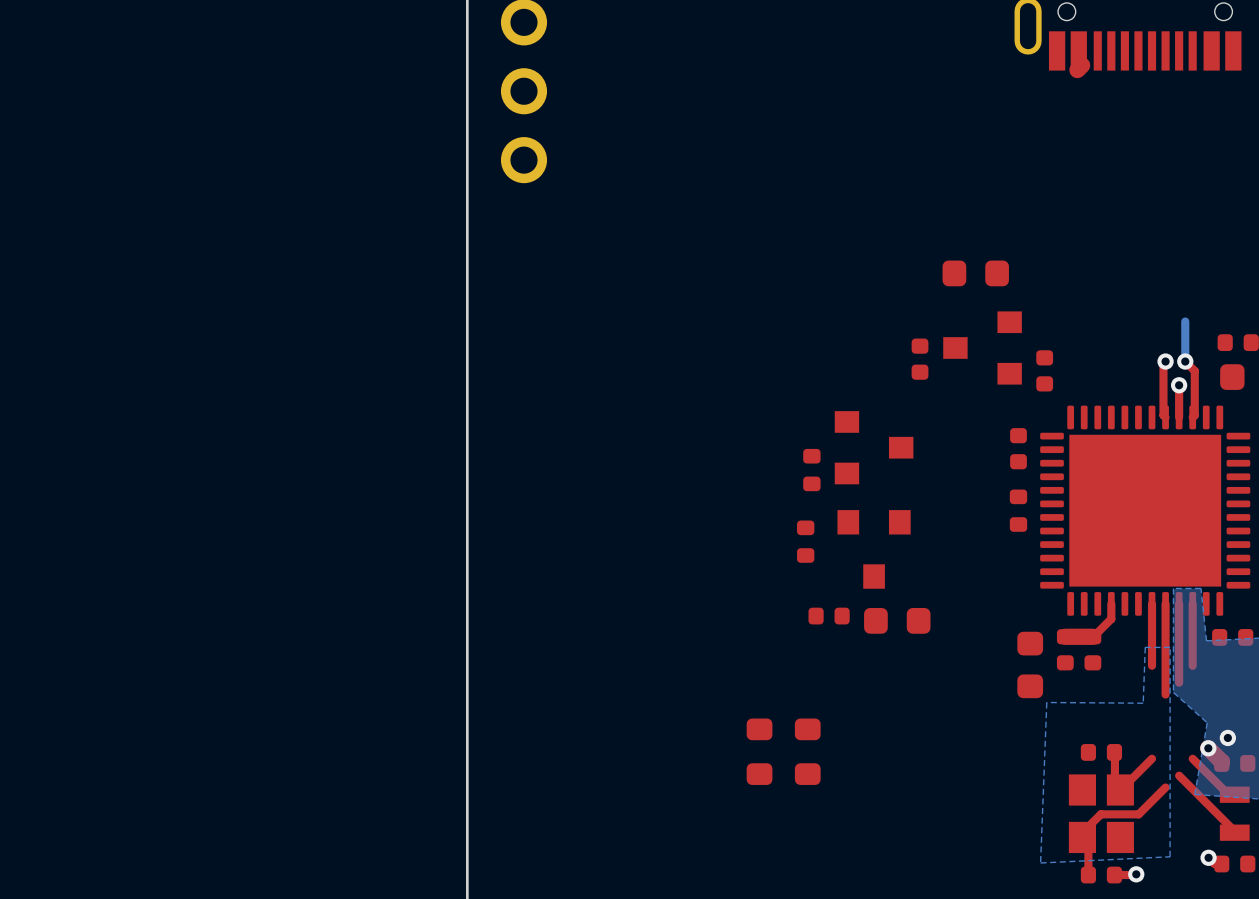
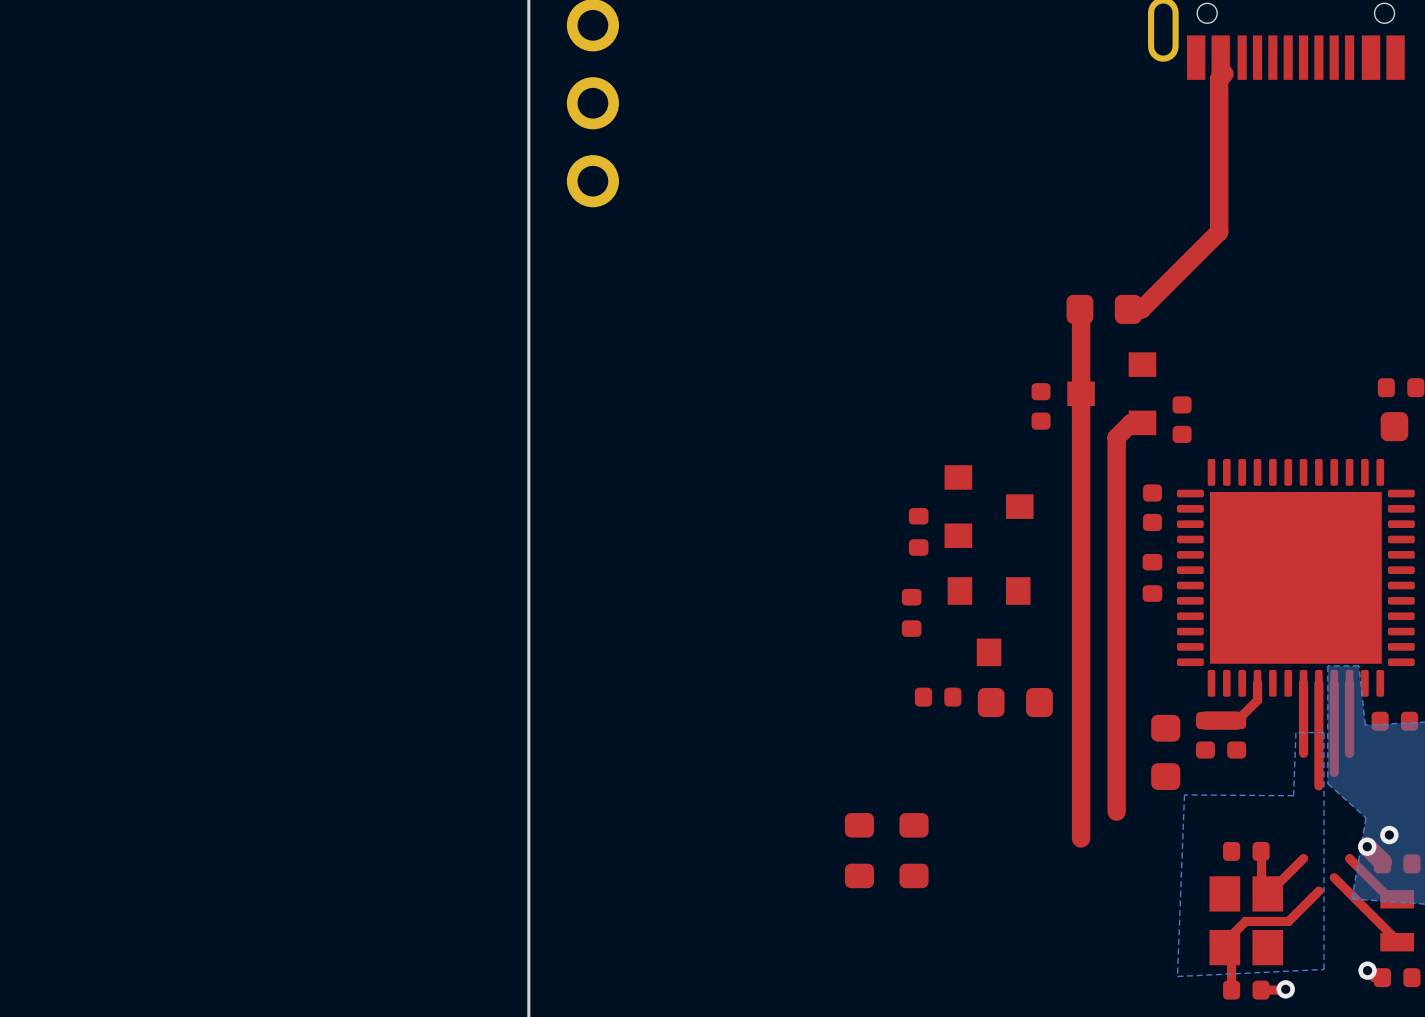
top track: none -> (1219, 79) (1219, 231) (1141, 309) (1128, 309)
top track: none -> (1077, 305) (1081, 308) (1081, 838)
bottom track: (1185, 321) (1185, 361) -> none
top track: (1165, 361) (1163, 363) (1163, 415) (1165, 417) -> none
via: (1165, 361) -> none
top track: (1185, 361) (1194, 371) (1194, 415) (1192, 417) -> none
via: (1185, 361) -> none
top track: none -> (1142, 422) (1131, 422) (1116, 437) (1116, 811)
top track: (1179, 385) (1179, 417) -> none
via: (1179, 385) -> none

